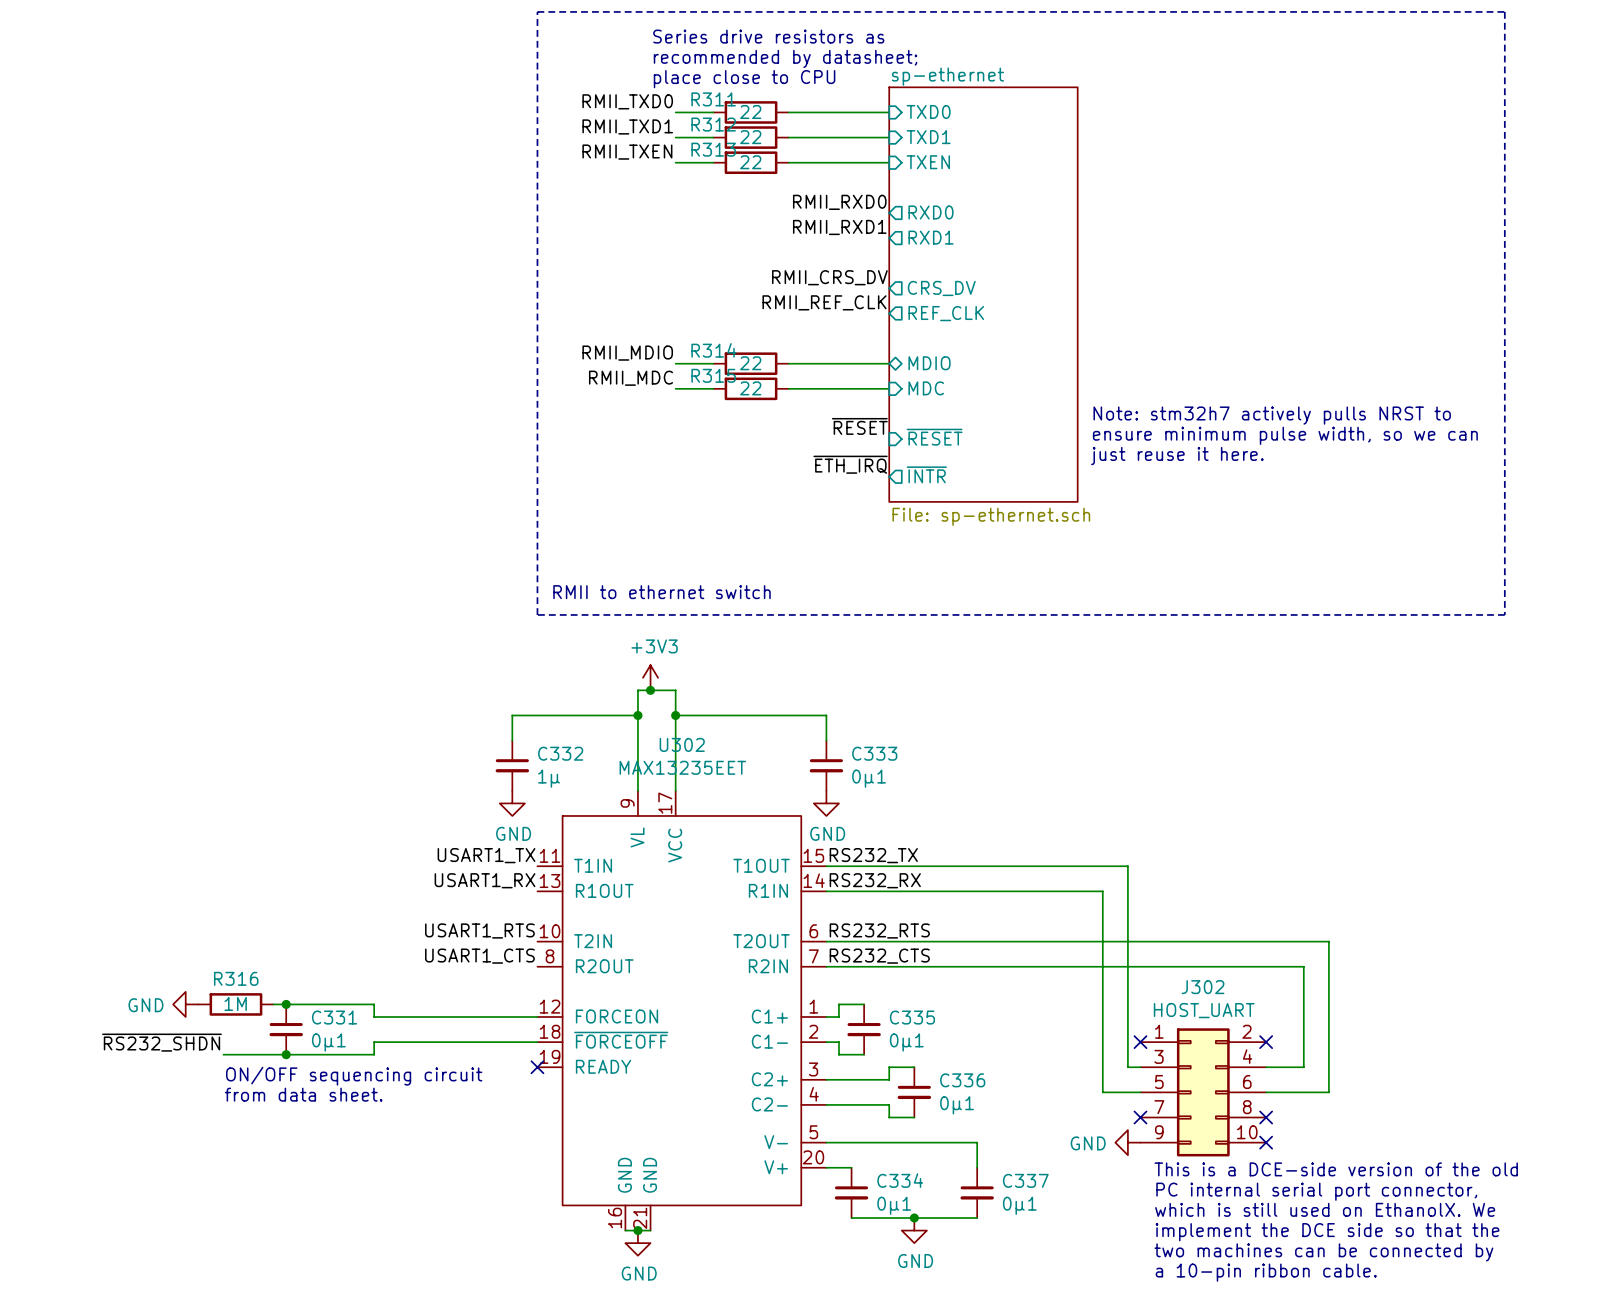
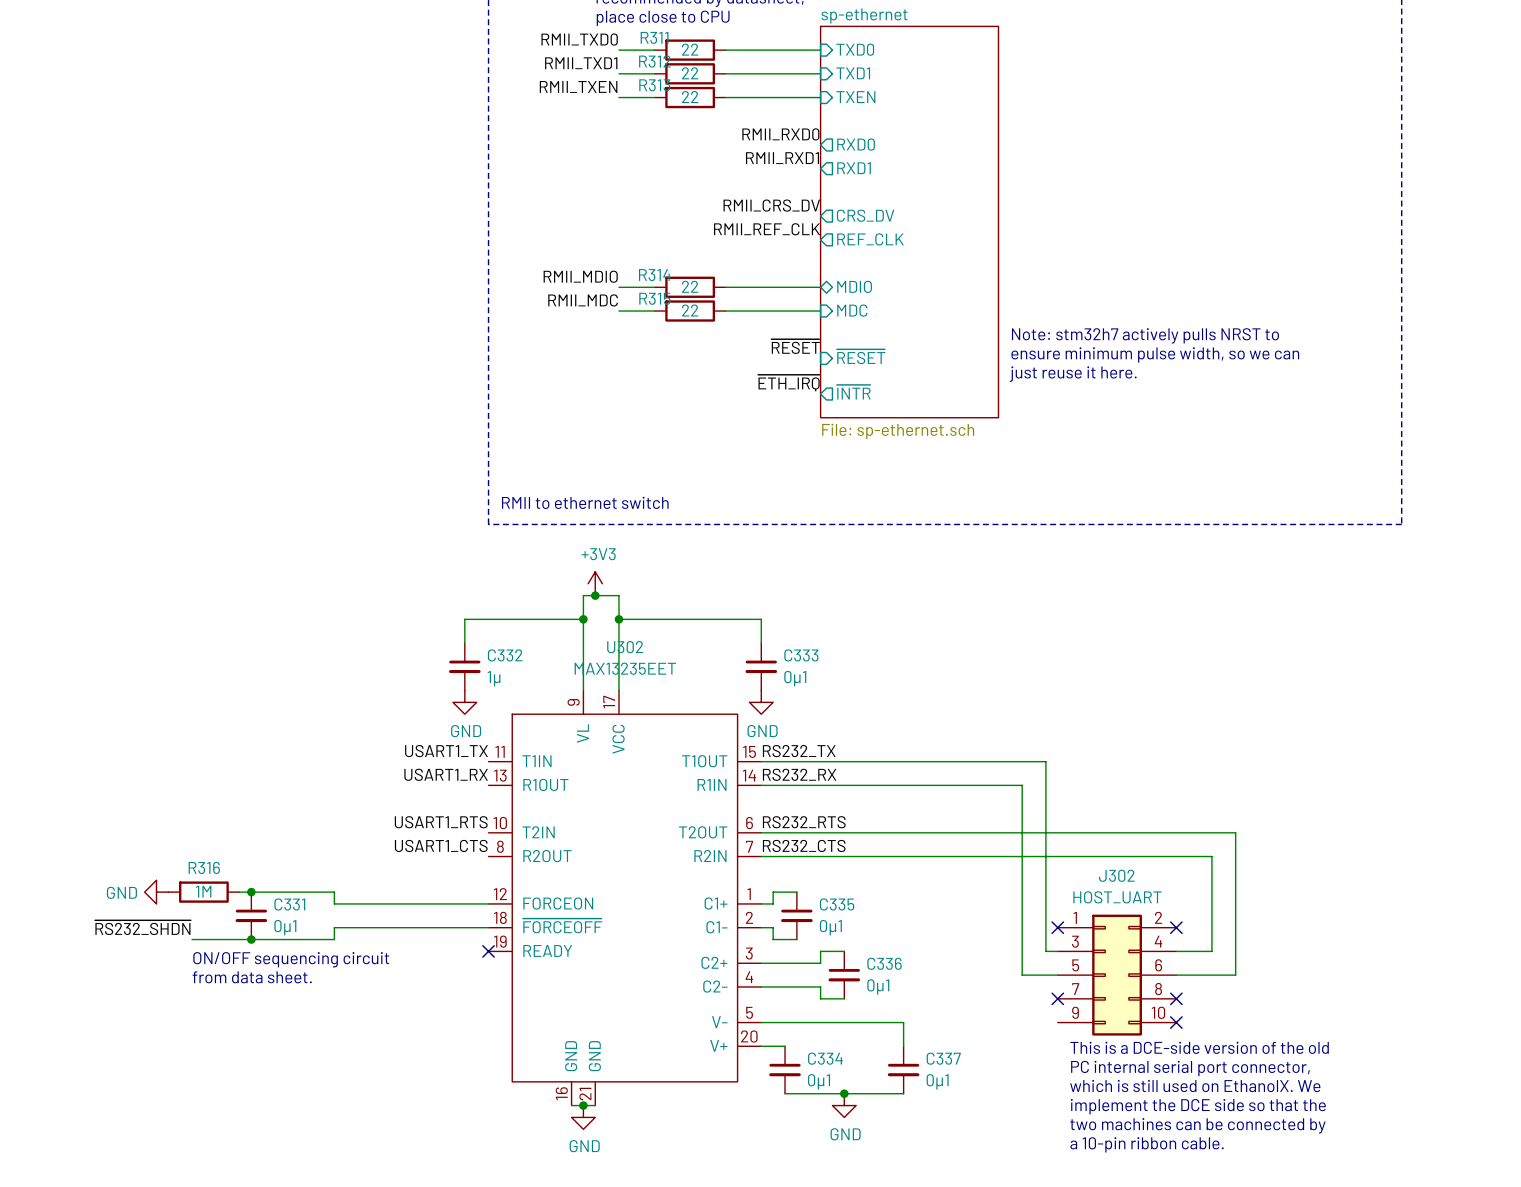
power symbol: GND (1127, 1142) -> none

